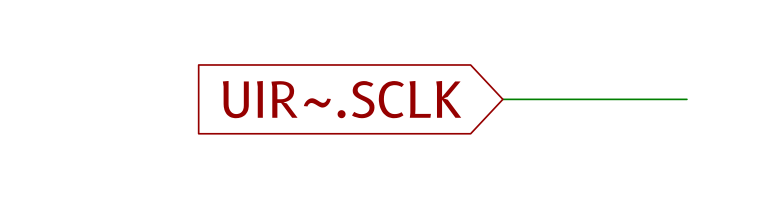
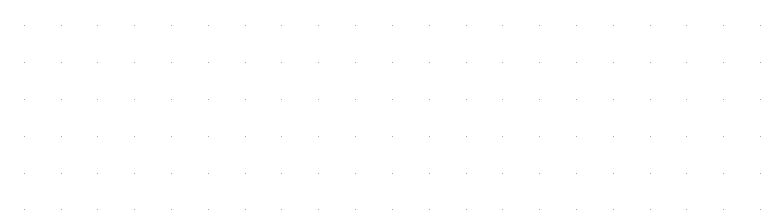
global label: UIR~.SCLK (342, 99) -> none
wire: (502, 99) (686, 99) -> none

